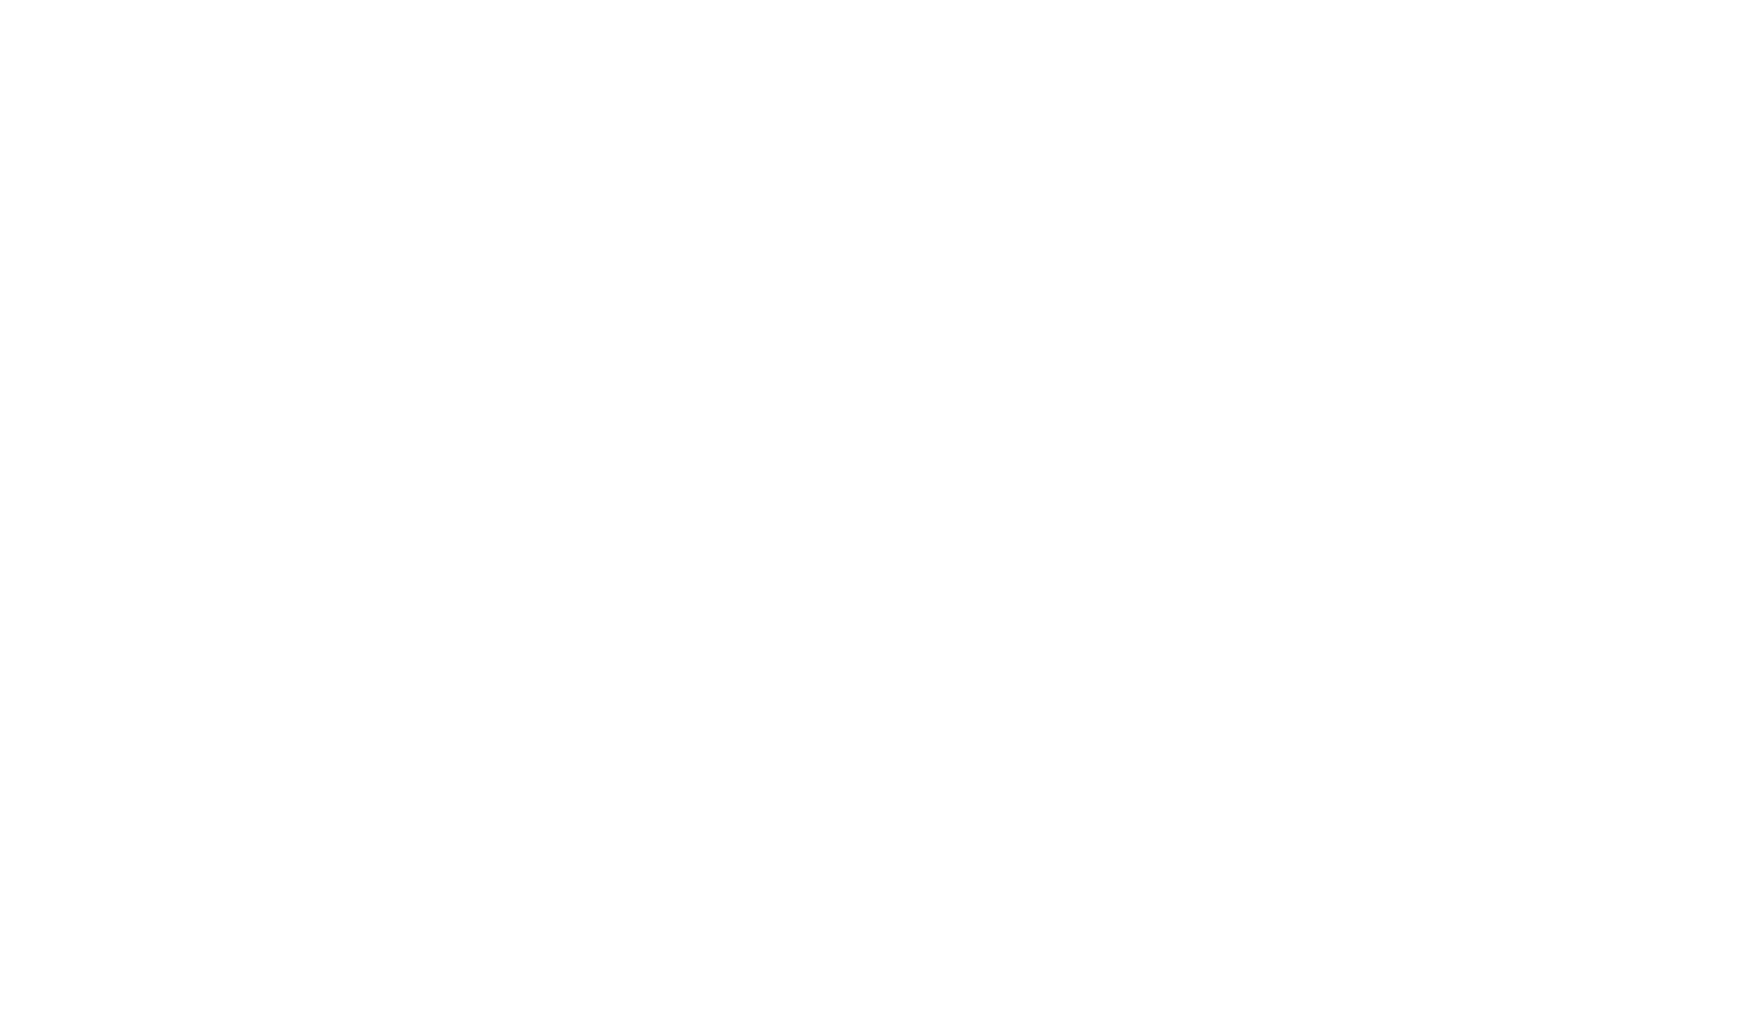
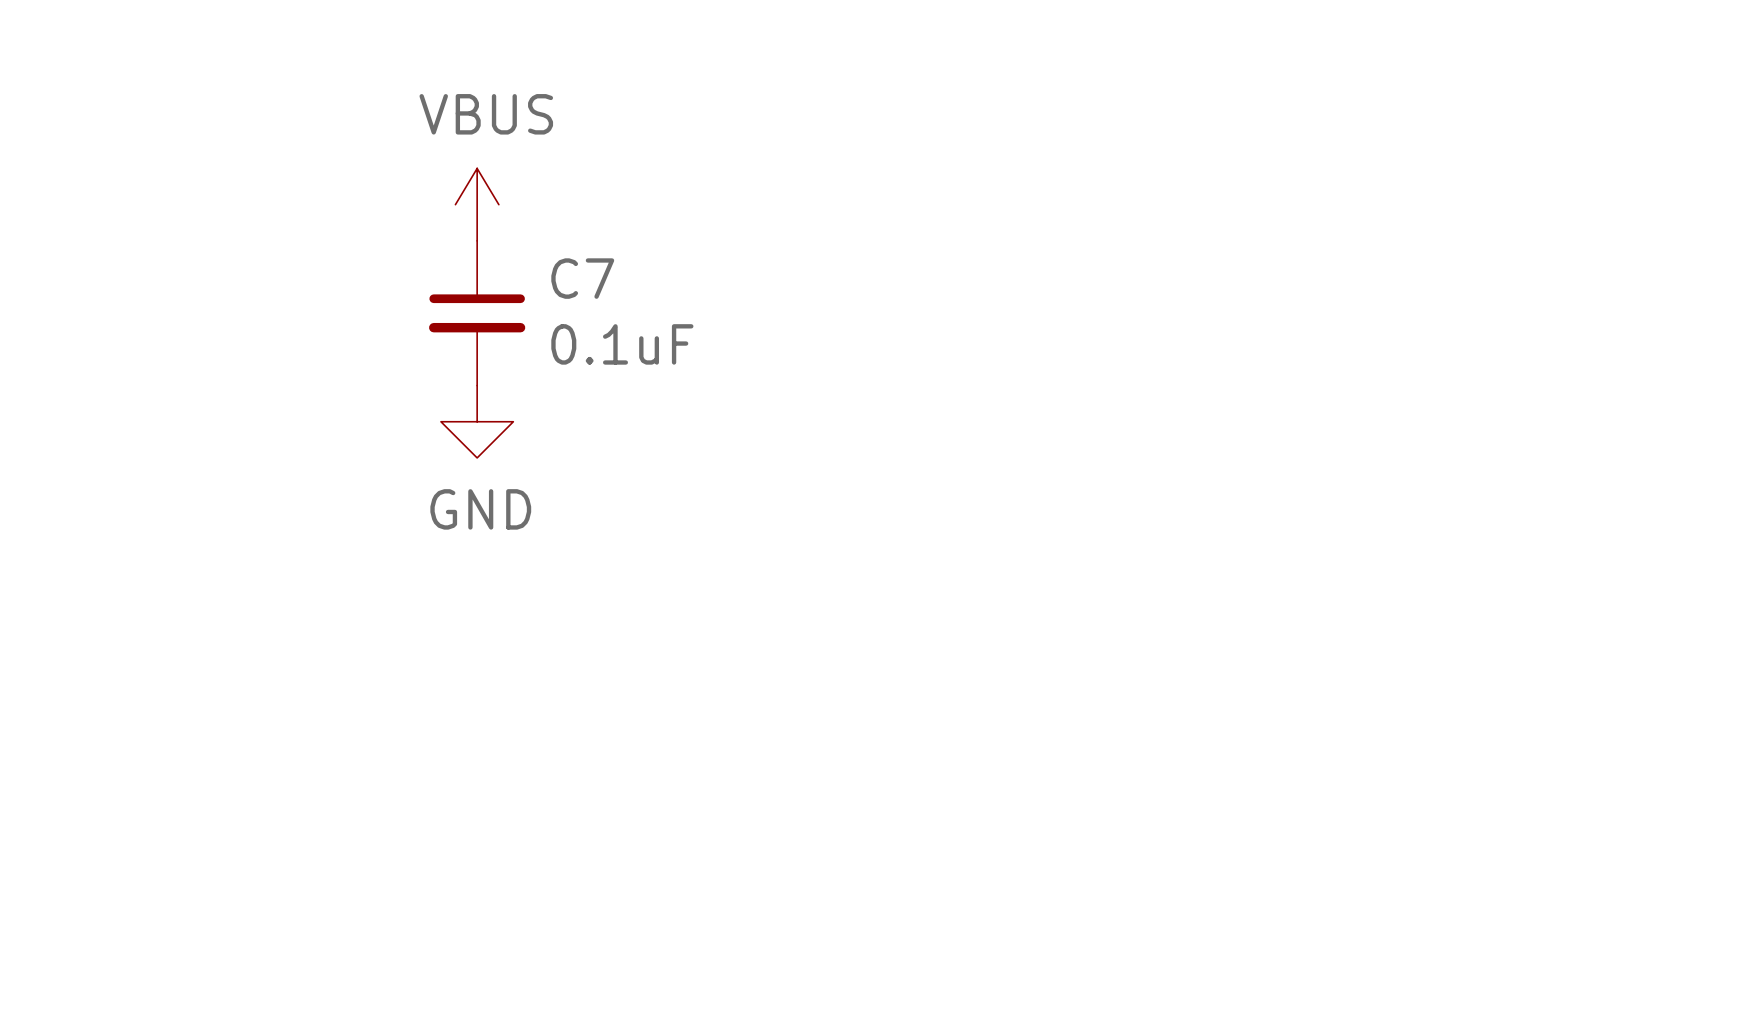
power symbol: none -> VBUS (477, 204)
C7: none -> 0.1uF (477, 313)
power symbol: none -> GND (477, 421)

